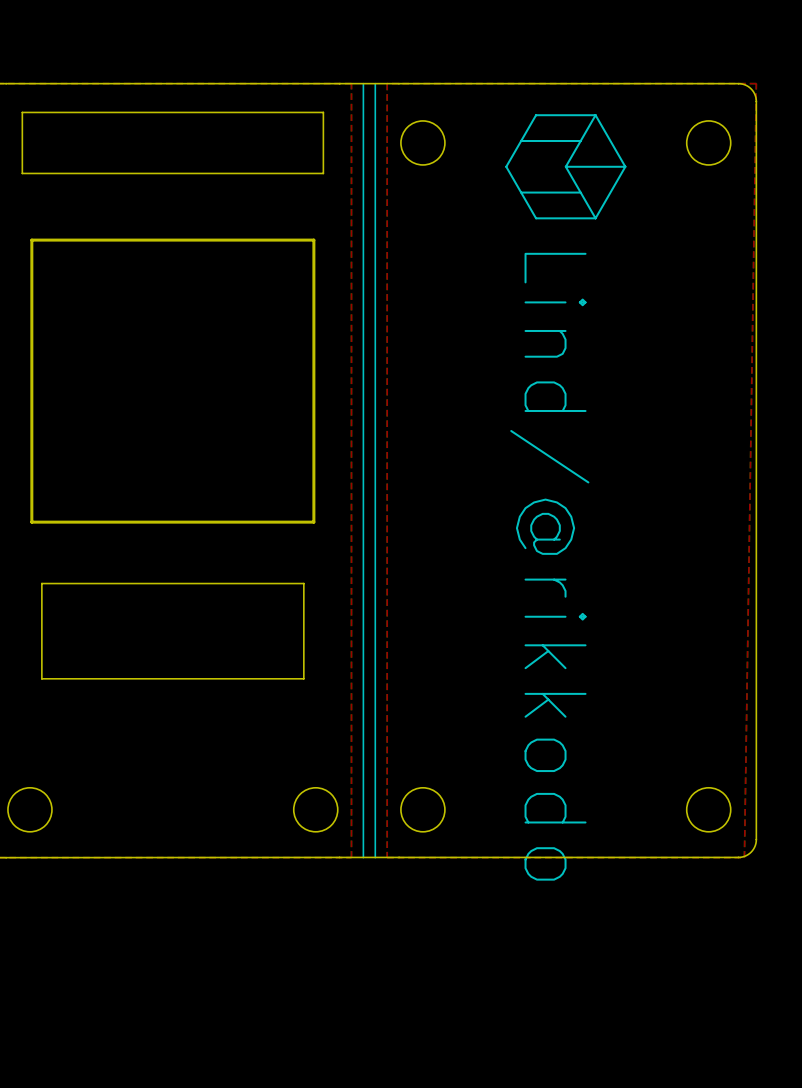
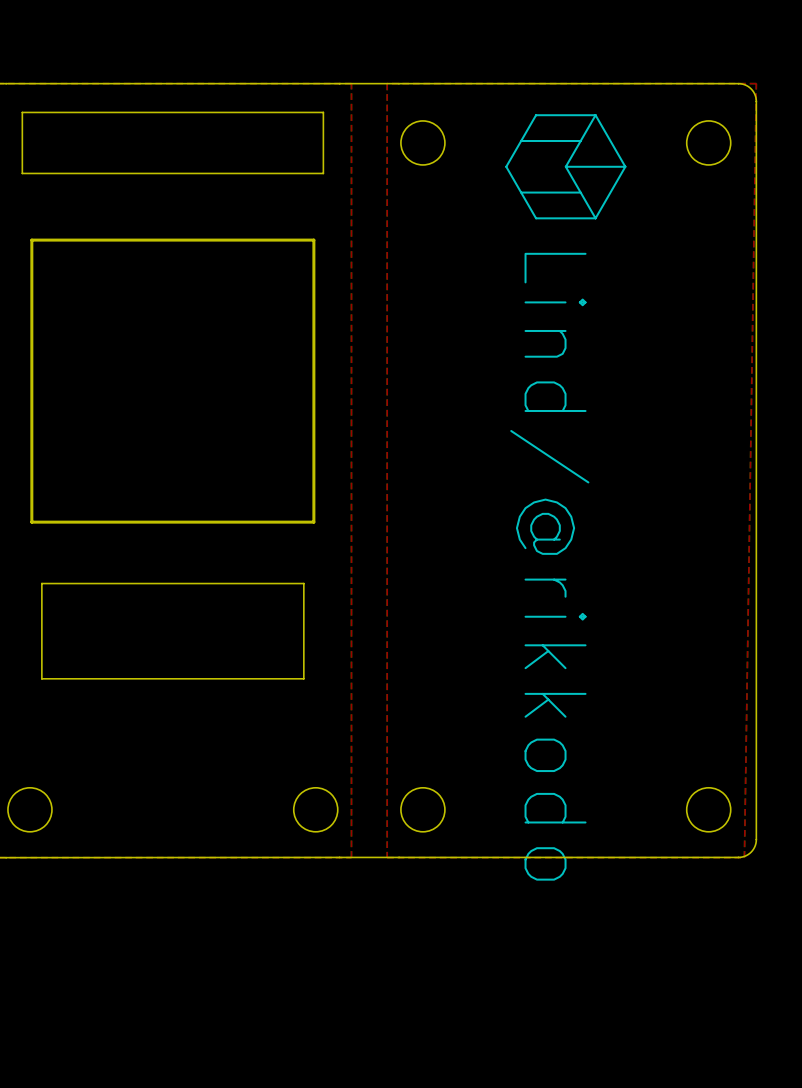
line: (363, 83) (363, 857) -> none
line: (375, 83) (375, 857) -> none

